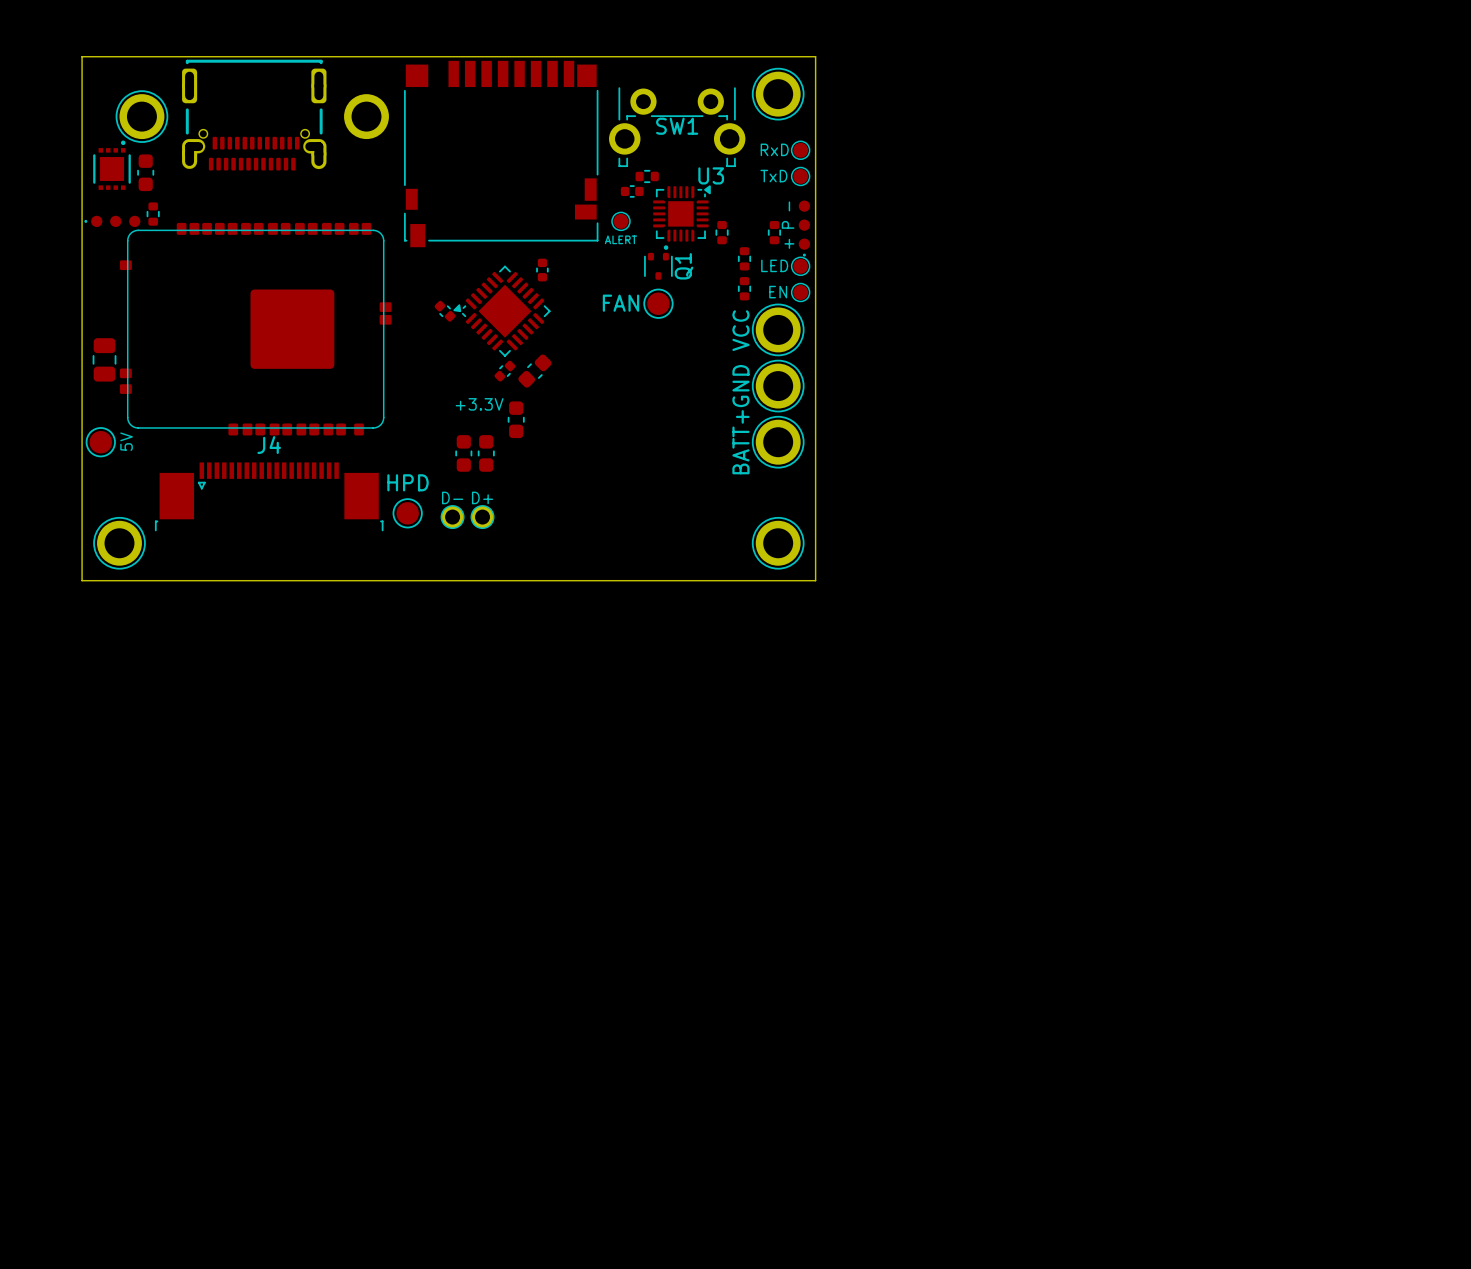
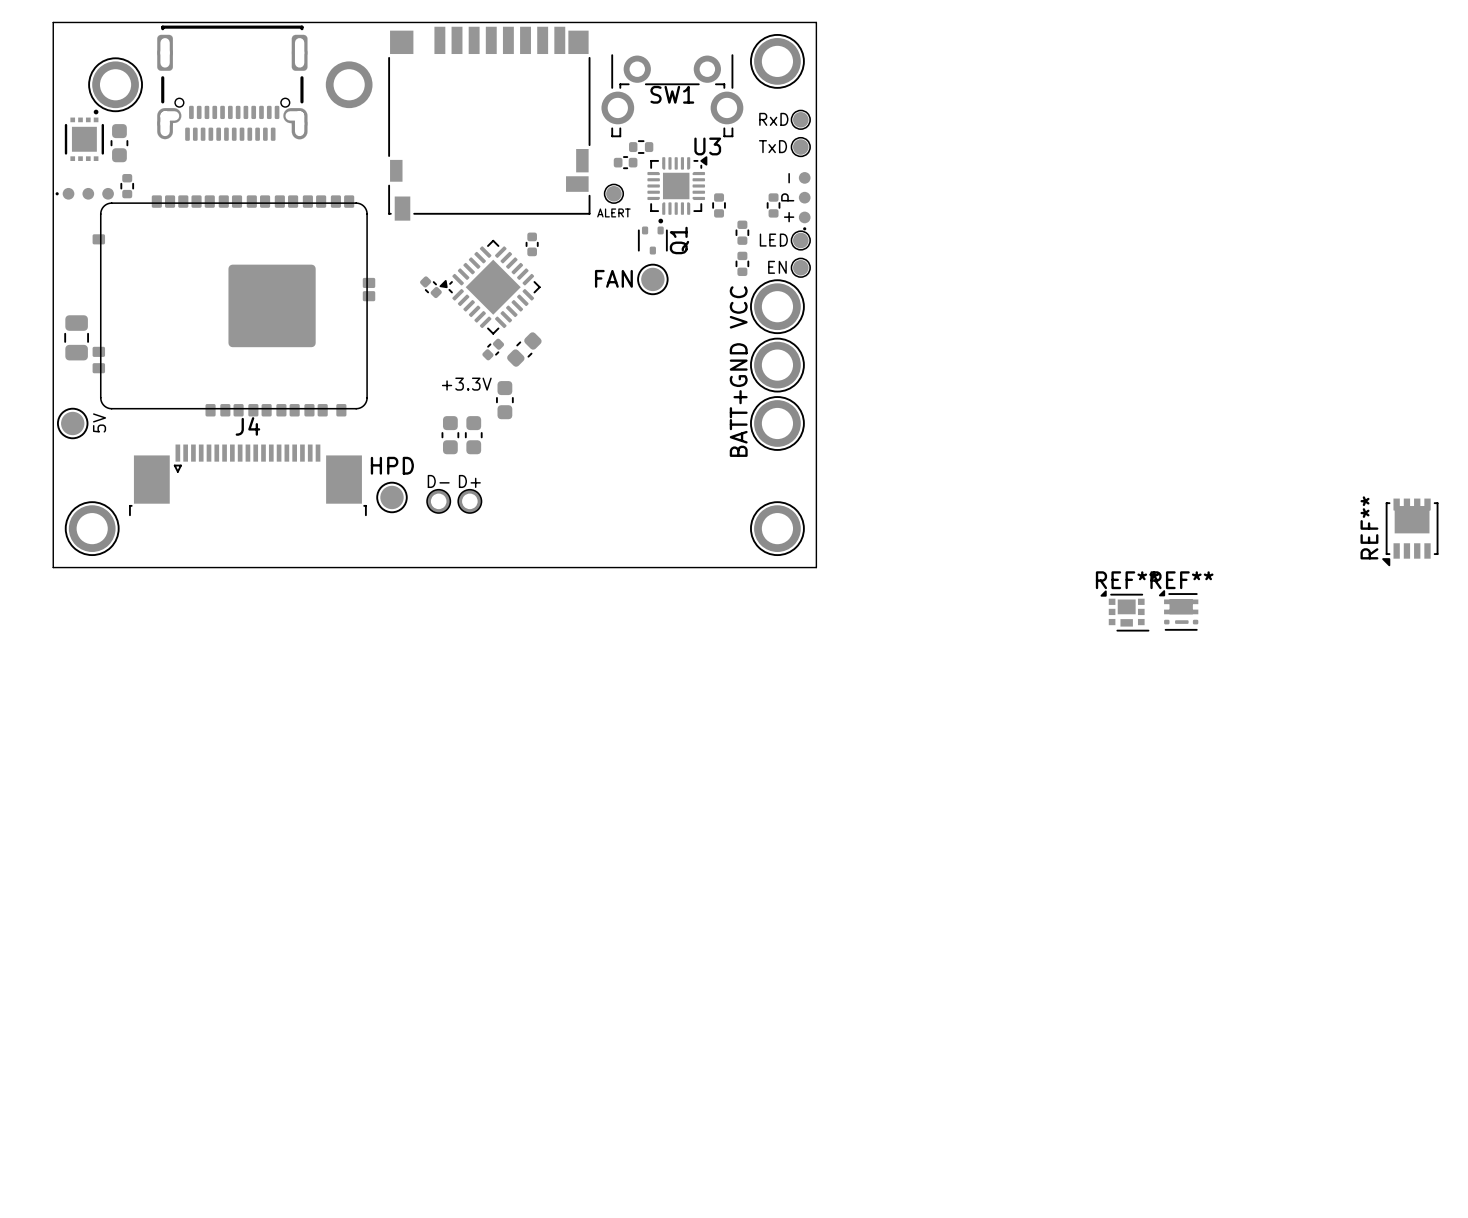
REF**: none -> (1410, 532)
REF**: none -> (1178, 610)
REF**: none -> (1124, 611)

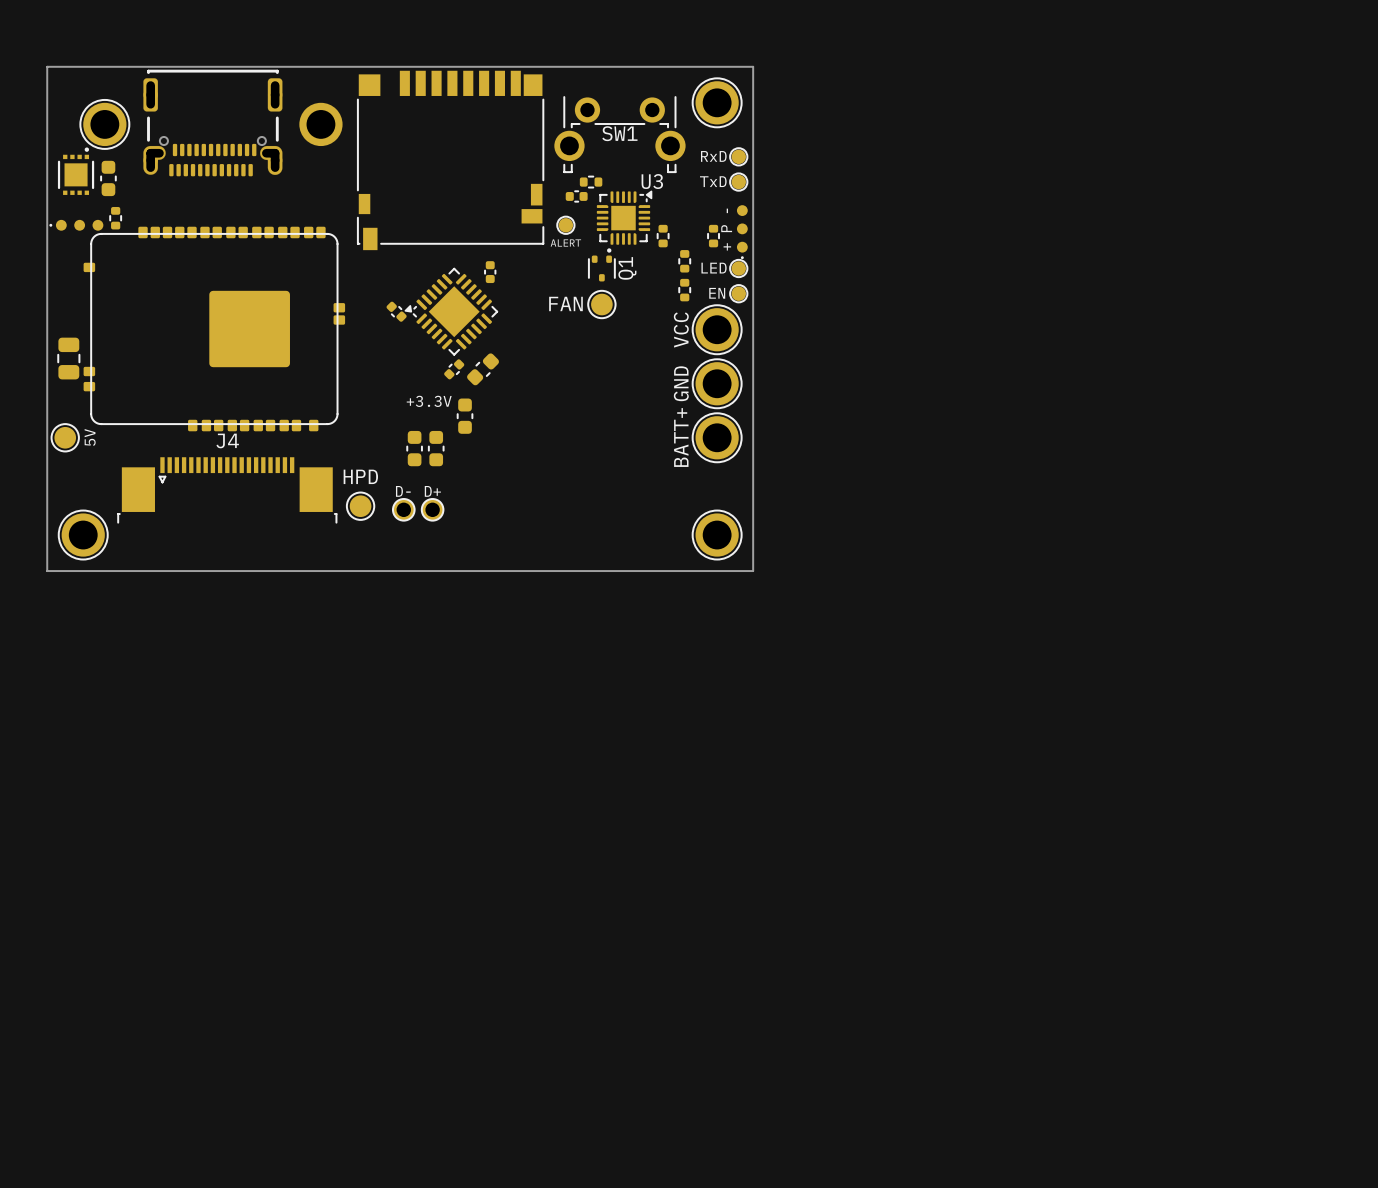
REF**: (1410, 532) -> none
REF**: (1178, 610) -> none
REF**: (1124, 611) -> none

